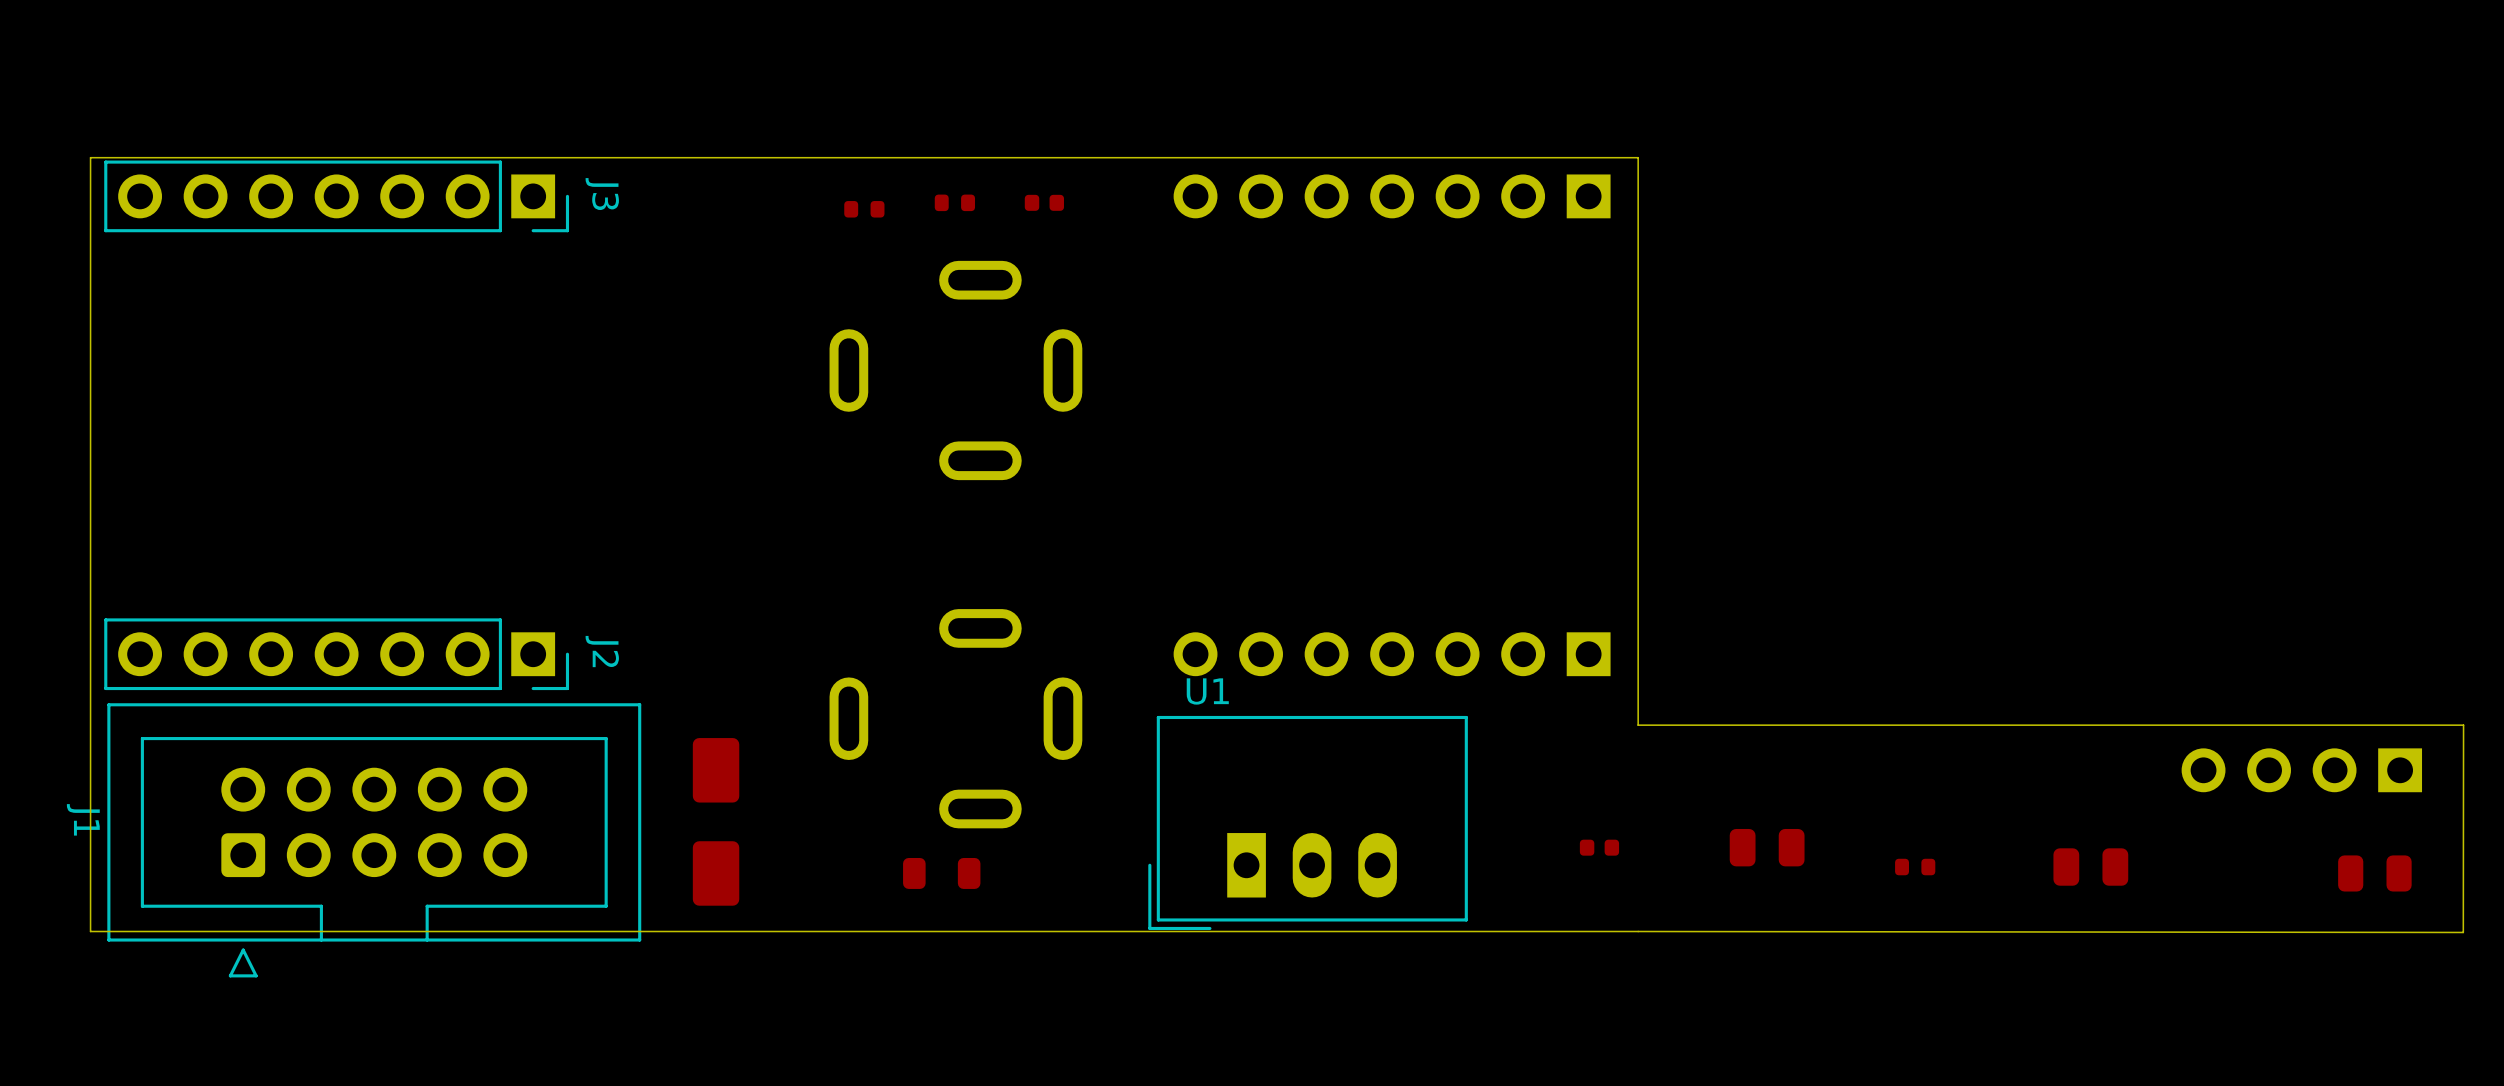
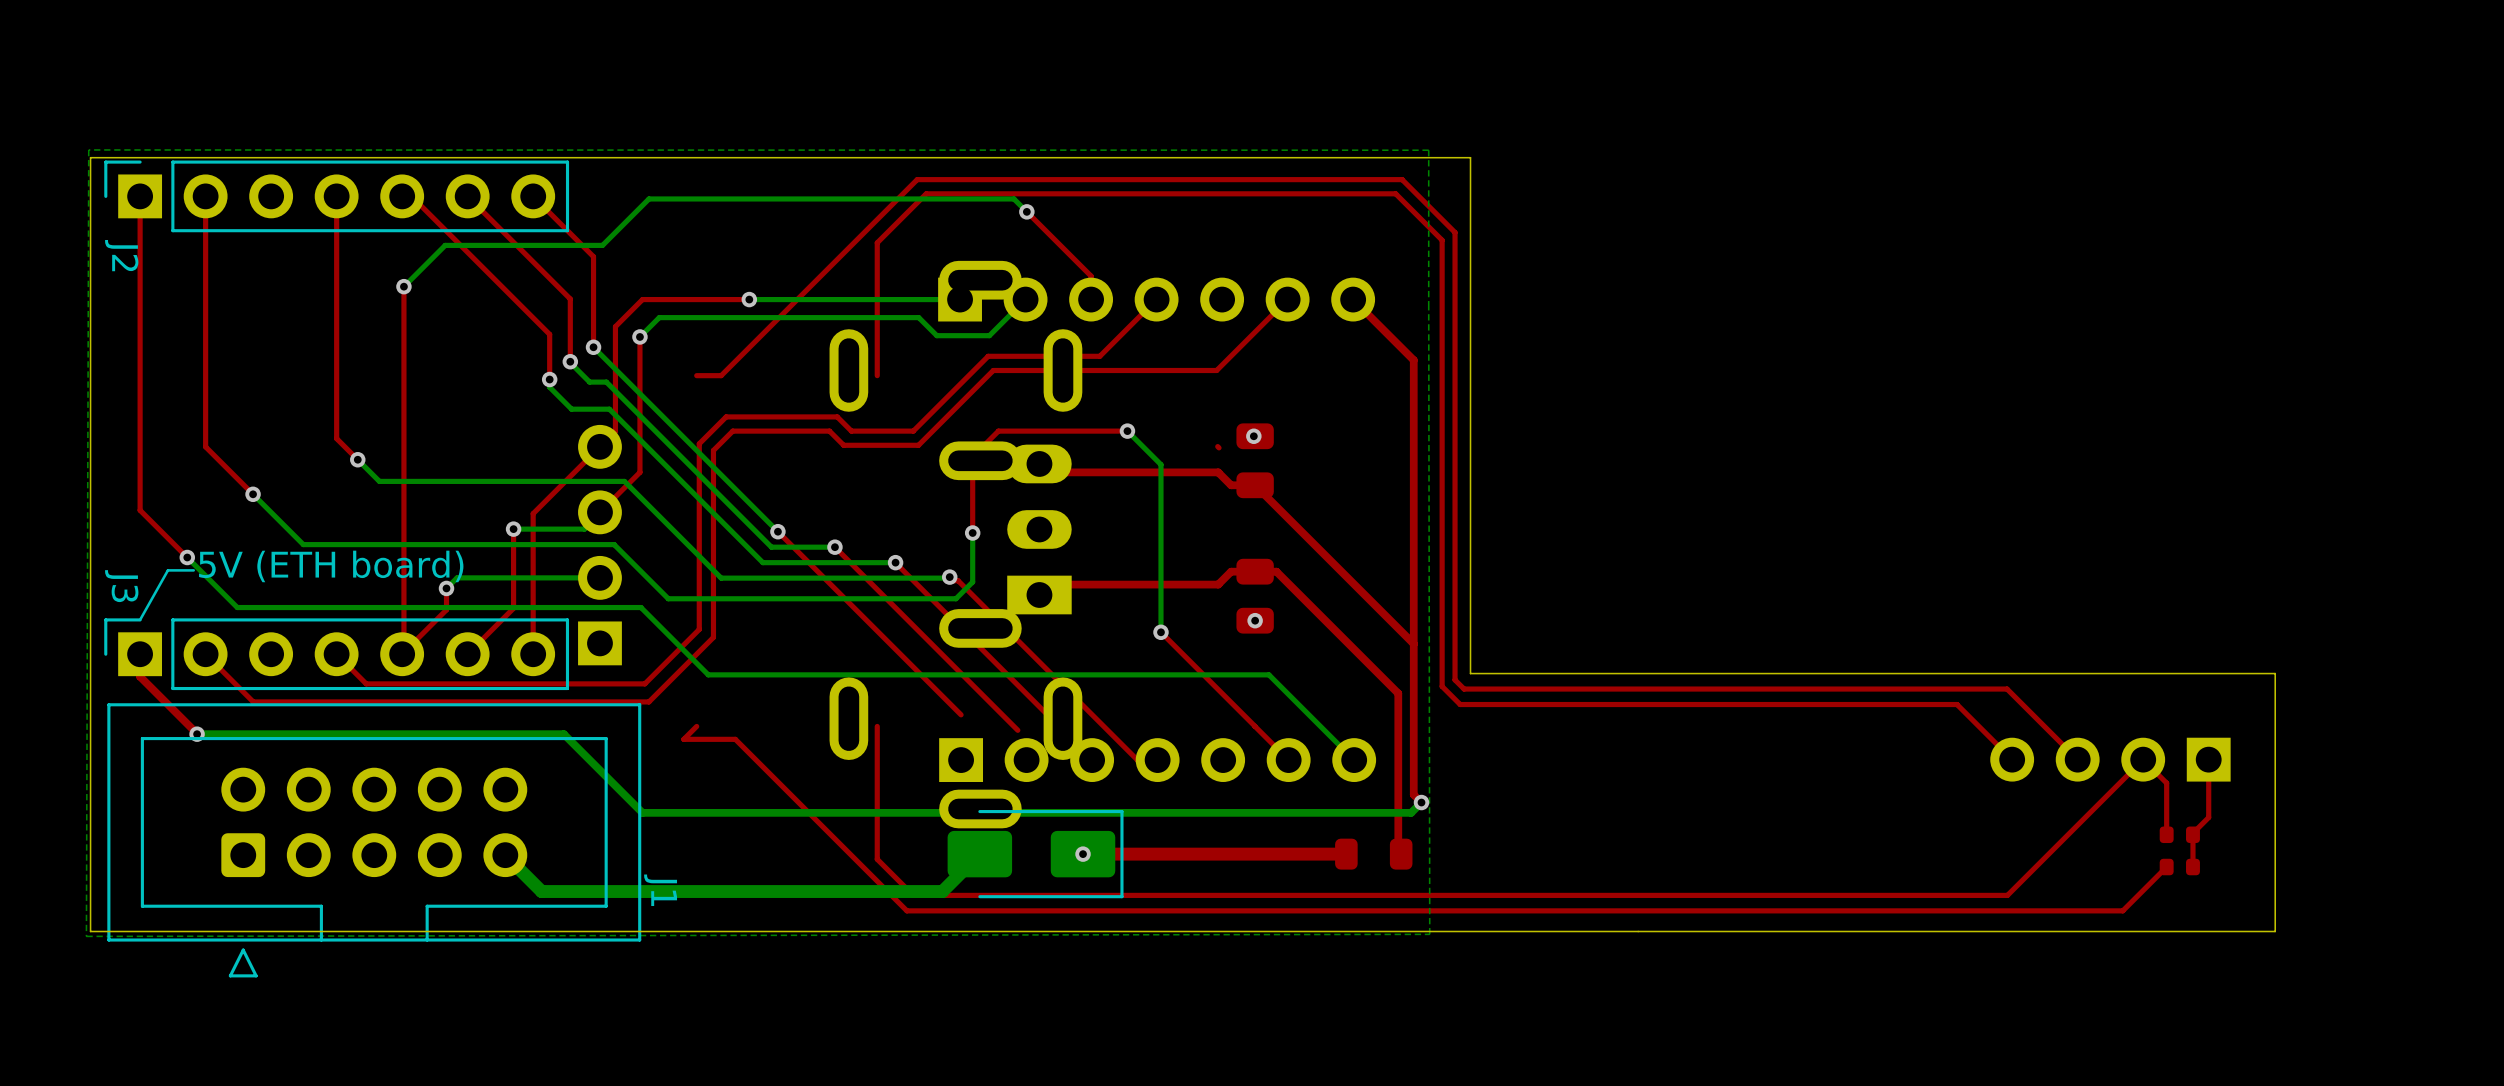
bottom zone outline: none -> (88, 149) (1428, 150) (1429, 934) (86, 936) (88, 149)
board edge: (1470, 157) (1638, 157) (1638, 725) (2463, 725) (2463, 932) (1638, 931) -> (1470, 157) (1470, 673) (2275, 673) (2275, 931) (1638, 931)
J3 name position: J3 (602, 194) -> J3 (121, 586)
top track: none -> (140, 196) (140, 510) (187, 557)
top track: none -> (205, 196) (205, 446) (253, 494)
top track: none -> (336, 196) (336, 438) (357, 459)
J3 rotation: 0° (336, 196) -> 180° (336, 654)
J3 position: (336, 196) -> (336, 654)
top track: none -> (402, 196) (411, 196) (549, 334) (549, 379)
top track: none -> (467, 196) (570, 299) (570, 361)
top track: none -> (533, 196) (593, 256) (593, 347)
part: (1392, 196) -> none
part: (954, 202) -> none
part: (1044, 202) -> none
part: (864, 209) -> none
top track: none -> (1026, 211) (1091, 276) (1091, 299)
bottom track: none -> (1026, 211) (1013, 198) (648, 198) (602, 245) (445, 245) (403, 286)
via: none -> (1026, 211)
top track: none -> (403, 286) (403, 652)
via: none -> (403, 286)
top track: none -> (749, 299) (642, 299) (615, 326) (615, 431) (533, 513) (533, 654)
via: none -> (749, 299)
bottom track: none -> (960, 299) (749, 299)
bottom track: none -> (1025, 299) (989, 335) (936, 335) (918, 317) (659, 317) (639, 336)
top track: none -> (1156, 299) (1099, 356) (988, 356) (913, 431) (851, 431) (837, 416) (726, 416) (699, 443) (699, 629) (644, 683) (366, 683) (336, 654)
part: none -> (1156, 299)
top track: none -> (1287, 299) (1216, 370) (993, 370) (918, 445) (843, 445) (829, 431) (732, 431) (713, 450) (713, 637) (648, 701) (253, 701) (205, 654)
top track: none -> (1353, 299) (1413, 360) (1413, 794) (1421, 802)
top track: none -> (639, 336) (639, 472) (599, 512)
via: none -> (639, 336)
bottom track: none -> (593, 347) (777, 531)
via: none -> (593, 347)
bottom track: none -> (570, 361) (589, 382) (606, 382) (771, 547) (834, 547)
via: none -> (570, 361)
top track: none -> (696, 375) (721, 375) (917, 179) (1402, 179) (1455, 232) (1455, 679) (1464, 689) (2007, 689) (2077, 759)
top track: none -> (877, 375) (877, 242) (926, 193) (1395, 193) (1442, 240) (1442, 686) (1460, 704) (1957, 704) (2012, 759)
bottom track: none -> (549, 379) (549, 387) (571, 409) (609, 409) (762, 562) (895, 562)
via: none -> (549, 379)
top track: none -> (1127, 431) (998, 431) (972, 456) (972, 532)
bottom track: none -> (1127, 431) (1160, 464) (1160, 632)
via: none -> (1127, 431)
via: none -> (1253, 436)
top track: none -> (1217, 446) (1219, 447)
bottom track: none -> (357, 459) (379, 481) (624, 481) (721, 578) (949, 577)
via: none -> (357, 459)
part: none -> (1255, 460)
top track: none -> (1039, 463) (1047, 472) (1218, 472) (1231, 485) (1255, 485) (1413, 643)
bottom track: none -> (253, 494) (303, 544) (614, 544) (668, 598) (955, 598) (972, 582) (972, 532)
via: none -> (253, 494)
bottom track: none -> (599, 512) (584, 529) (513, 529)
top track: none -> (513, 529) (513, 608) (467, 654)
via: none -> (513, 529)
top track: none -> (777, 531) (961, 714)
via: none -> (777, 531)
via: none -> (972, 532)
part: none -> (599, 545)
top track: none -> (834, 547) (1017, 730)
via: none -> (834, 547)
bottom track: none -> (187, 557) (237, 607) (640, 607) (708, 674) (1268, 674) (1354, 760)
via: none -> (187, 557)
top track: none -> (895, 562) (1092, 760)
via: none -> (895, 562)
text: none -> 5V (ETH board) (331, 566)
line: none -> (193, 570) (167, 570) (140, 619)
bottom track: none -> (599, 577) (457, 577) (446, 588)
top track: none -> (949, 577) (953, 580) (958, 580) (1137, 760) (1157, 760)
via: none -> (949, 577)
top track: none -> (446, 588) (446, 609) (402, 654)
via: none -> (446, 588)
top track: none -> (1039, 594) (1049, 584) (1218, 584) (1231, 571) (1276, 571) (1398, 693) (1398, 851) (1401, 854)
part: none -> (1255, 596)
via: none -> (1255, 620)
top track: none -> (1160, 632) (1288, 760)
via: none -> (1160, 632)
J2 name position: J2 (602, 651) -> J2 (121, 255)
top track: none -> (140, 654) (140, 676) (197, 733)
J2 rotation: 0° (336, 654) -> 180° (336, 196)
J2 position: (336, 654) -> (336, 196)
part: (1392, 654) -> none
top track: none -> (696, 726) (683, 739) (735, 739) (906, 910) (2122, 910) (2166, 867)
top track: none -> (877, 726) (877, 859) (913, 895) (2007, 895) (2143, 759) (2166, 783) (2166, 834)
bottom track: none -> (197, 734) (563, 734) (642, 812) (1411, 812) (1421, 802)
via: none -> (197, 734)
top track: none -> (2208, 759) (2208, 817) (2192, 833) (2192, 867)
part: none -> (1157, 760)
part position: (2301, 770) -> (2110, 759)
via: none -> (1421, 802)
J1 name position: J1 (83, 819) -> J1 (660, 890)
part side: top (716, 821) -> bottom (1035, 854)
U1 side: bottom (1308, 822) -> top (1039, 529)
part: none -> (2179, 834)
part: (1599, 847) -> none
part: (1767, 847) -> none
bottom track: none -> (979, 854) (942, 891) (541, 891) (505, 855)
via: none -> (1083, 854)
top track: none -> (1346, 854) (1083, 854)
part: (1915, 867) -> none
part: (2090, 867) -> none
part: none -> (2179, 867)
part position: (941, 873) -> (1373, 854)
part: (2374, 873) -> none

